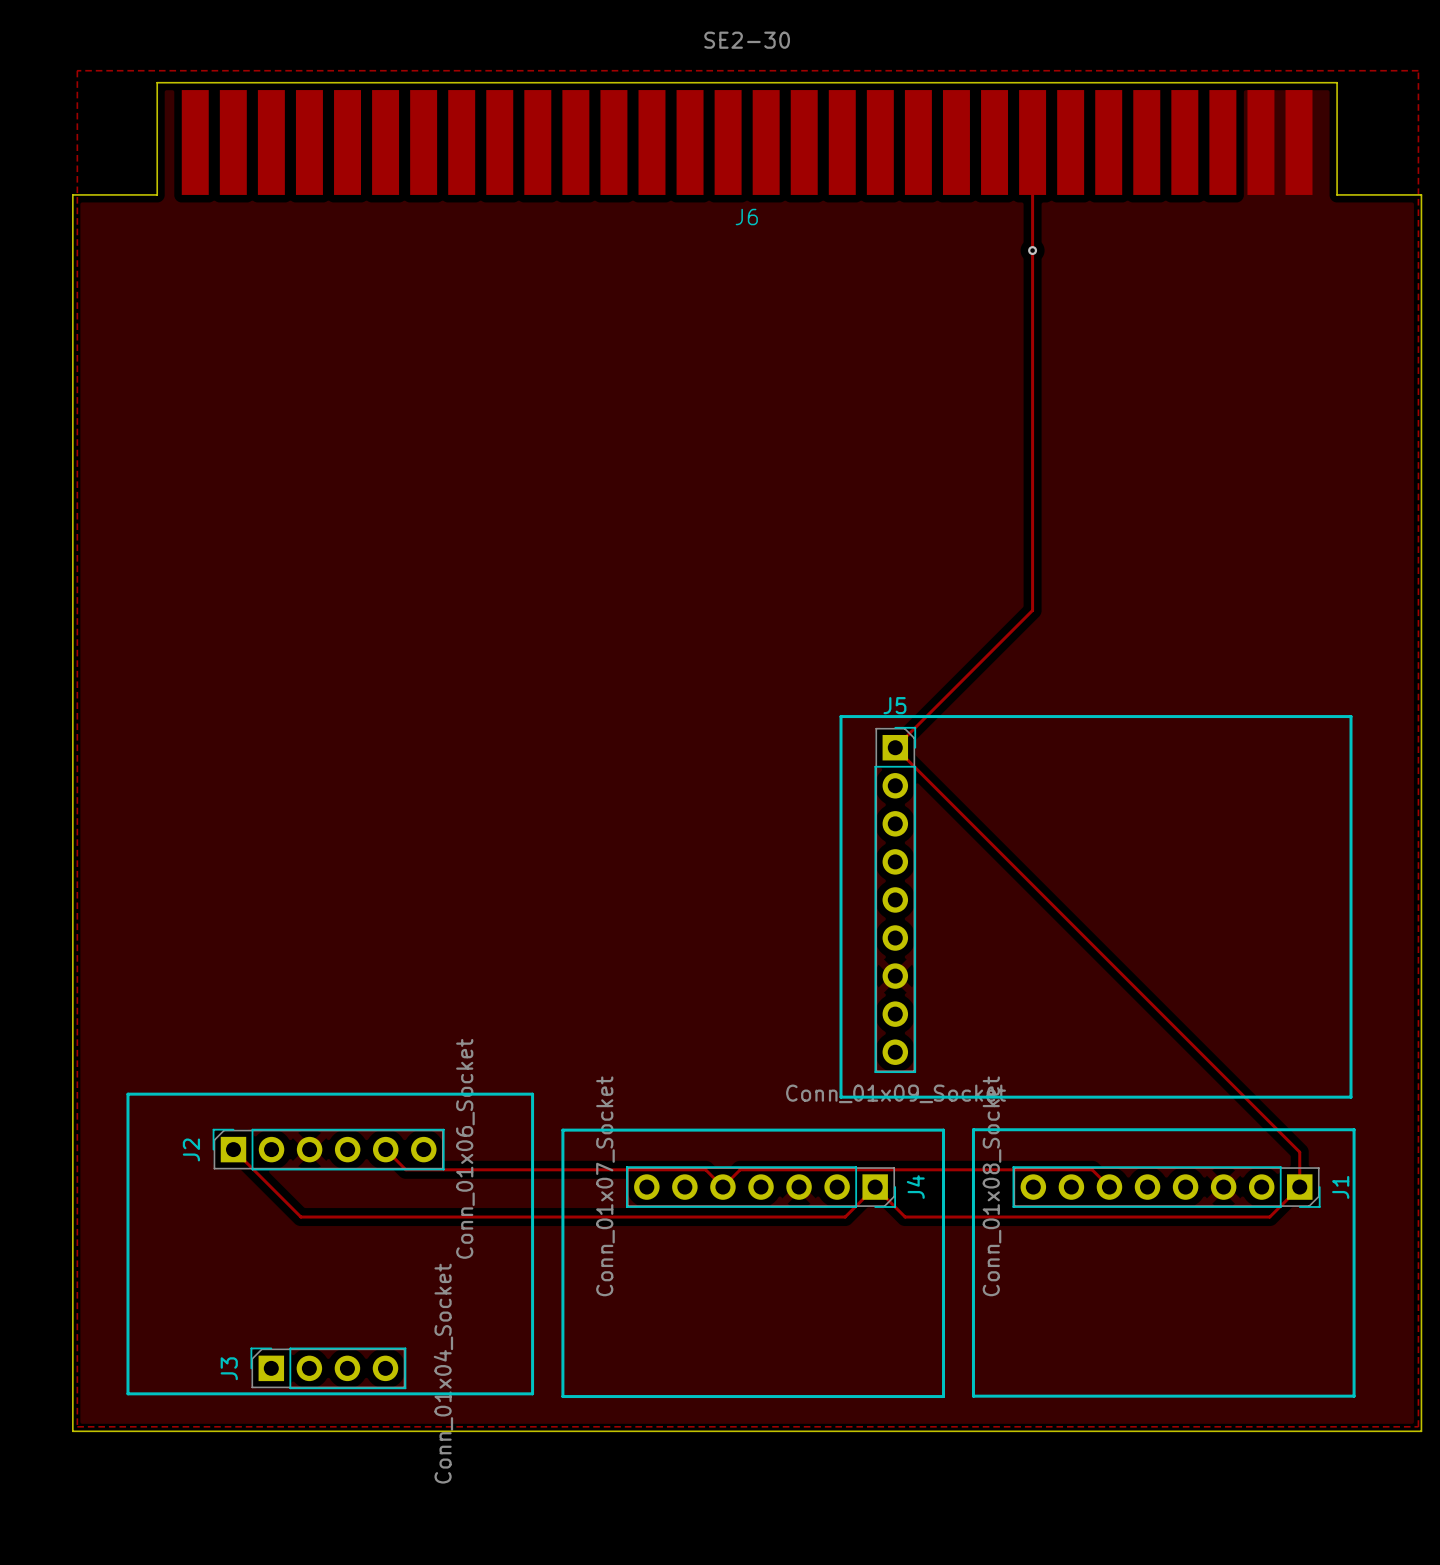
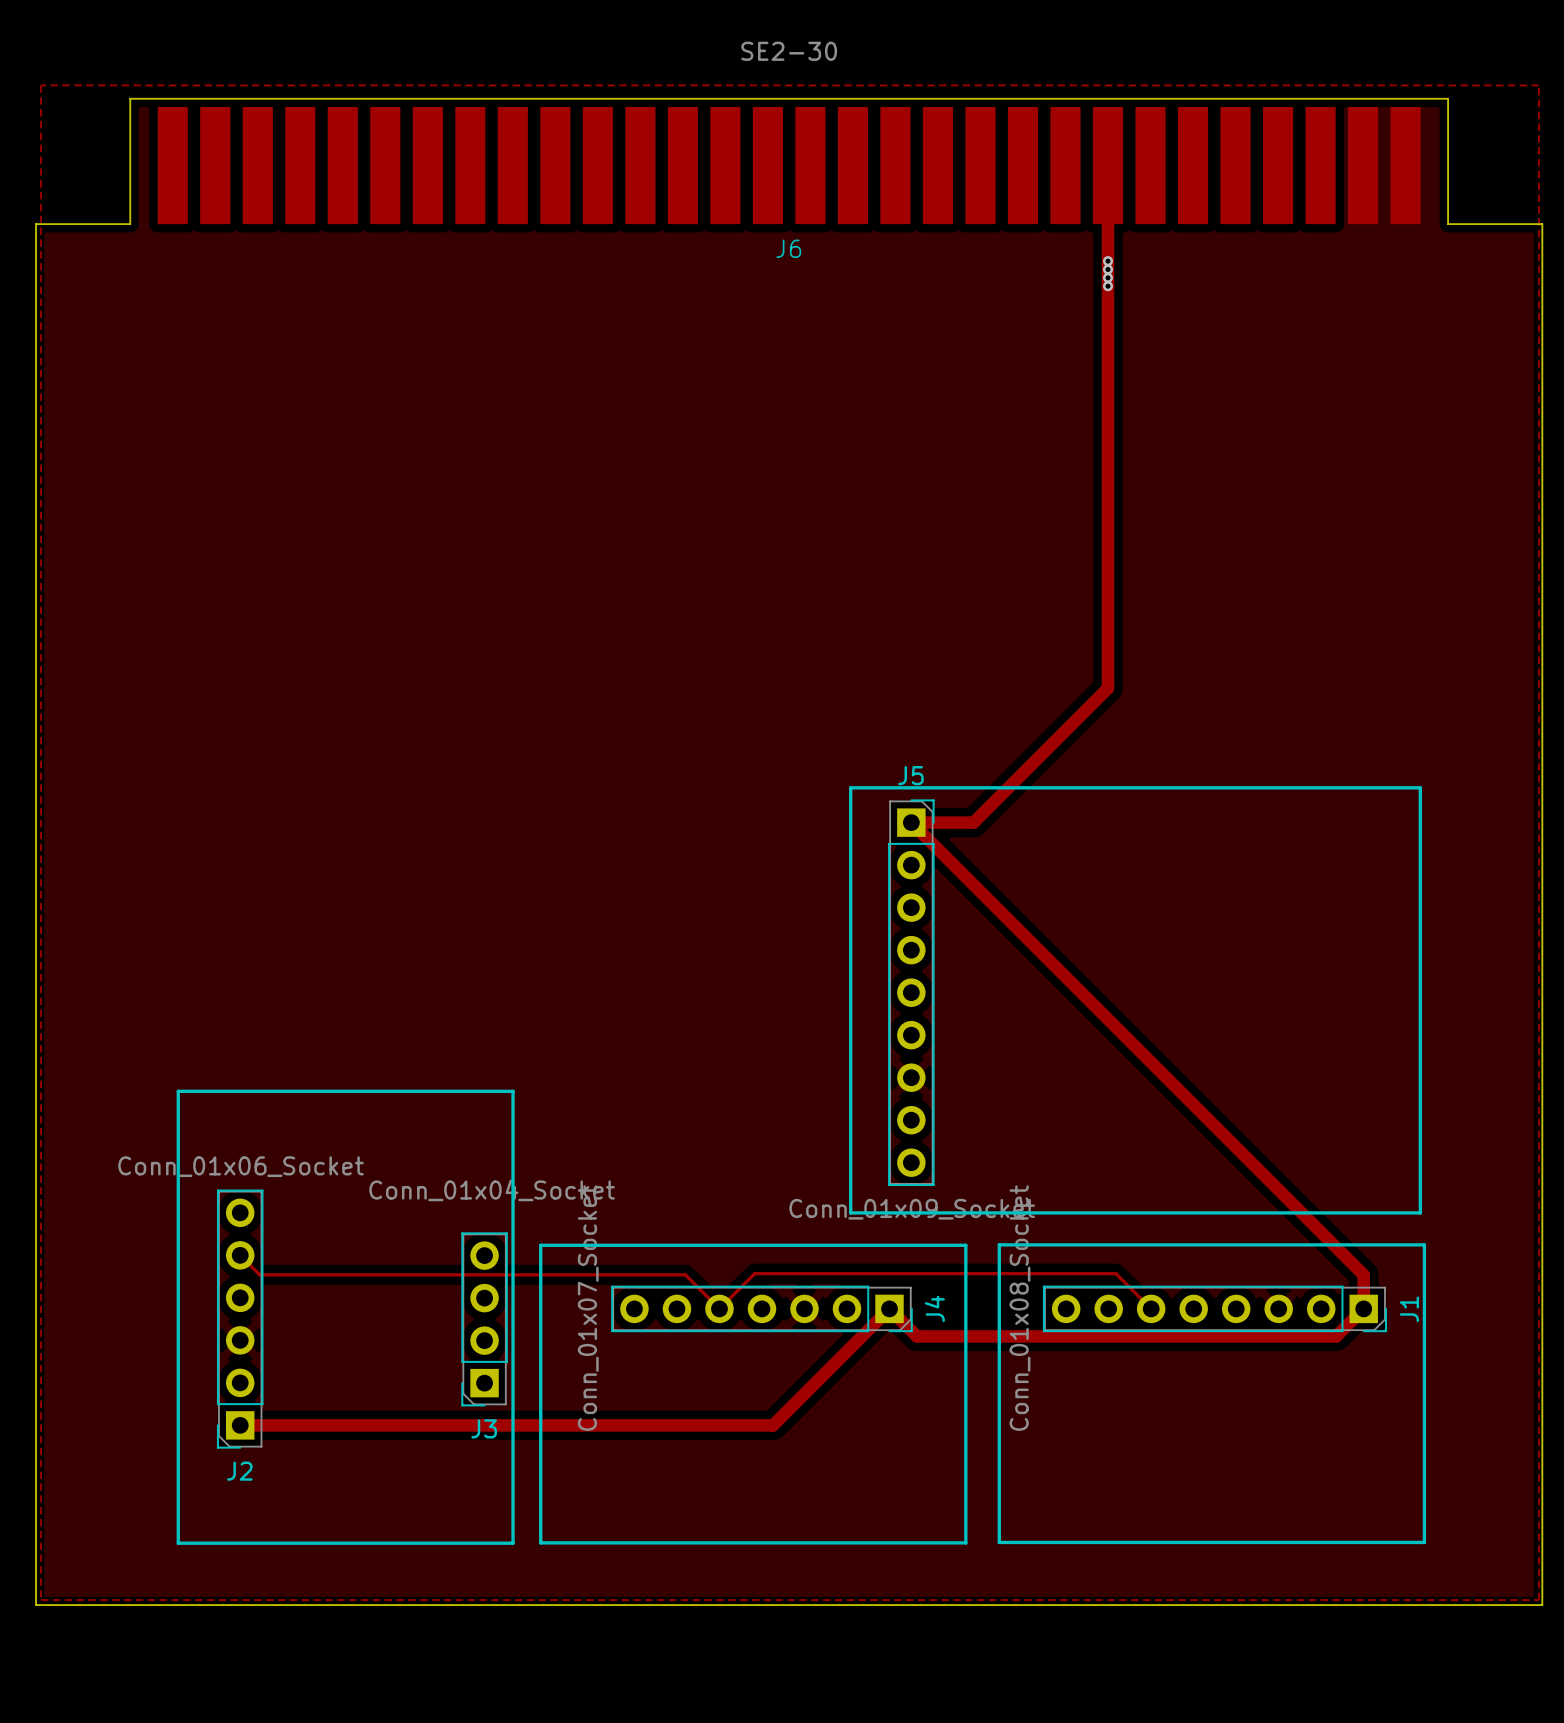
track width: thin (1032, 142) (1032, 610) (912, 730) -> thick (1108, 165) (1108, 688) (973, 822)
via: none -> (1108, 261)
via: none -> (1108, 269)
via: none -> (1108, 277)
line: (841, 716) (1351, 716) (1351, 1097) (841, 1097) (841, 716) -> (850, 787) (1420, 787) (1420, 1212) (850, 1212) (850, 787)
track: (912, 730) (895, 747) (1299, 1152) (1299, 1187) (1269, 1217) (905, 1217) (875, 1187) (845, 1217) (300, 1217) (233, 1149) -> (973, 822) (911, 822) (1363, 1275) (1363, 1308) (1336, 1336) (917, 1336) (889, 1308) (773, 1425) (240, 1425)
J5 position: (895, 899) -> (911, 992)
line: (127, 1094) (532, 1094) (532, 1393) (127, 1393) (127, 1094) -> (178, 1091) (178, 1543) (513, 1543) (513, 1091) (178, 1091)
track: none -> (240, 1255) (259, 1274) (685, 1274) (719, 1308) (754, 1273) (1115, 1273) (1151, 1308)
line: (973, 1129) (1354, 1129) (1354, 1396) (973, 1396) (973, 1129) -> (999, 1244) (1424, 1244) (1424, 1542) (999, 1542) (999, 1244)
line: (562, 1130) (943, 1130) (943, 1396) (562, 1396) (562, 1130) -> (540, 1245) (965, 1245) (965, 1542) (540, 1542) (540, 1245)
J2 rotation: 0° (328, 1149) -> 90° counterclockwise (240, 1319)
track: (385, 1149) (405, 1169) (705, 1169) (722, 1187) (740, 1169) (1092, 1169) (1109, 1187) -> none
J4 position: (761, 1187) -> (761, 1308)
J1 position: (1166, 1187) -> (1214, 1308)
J3 rotation: 0° (328, 1368) -> 90° counterclockwise (484, 1319)
J3 position: (328, 1368) -> (484, 1319)

